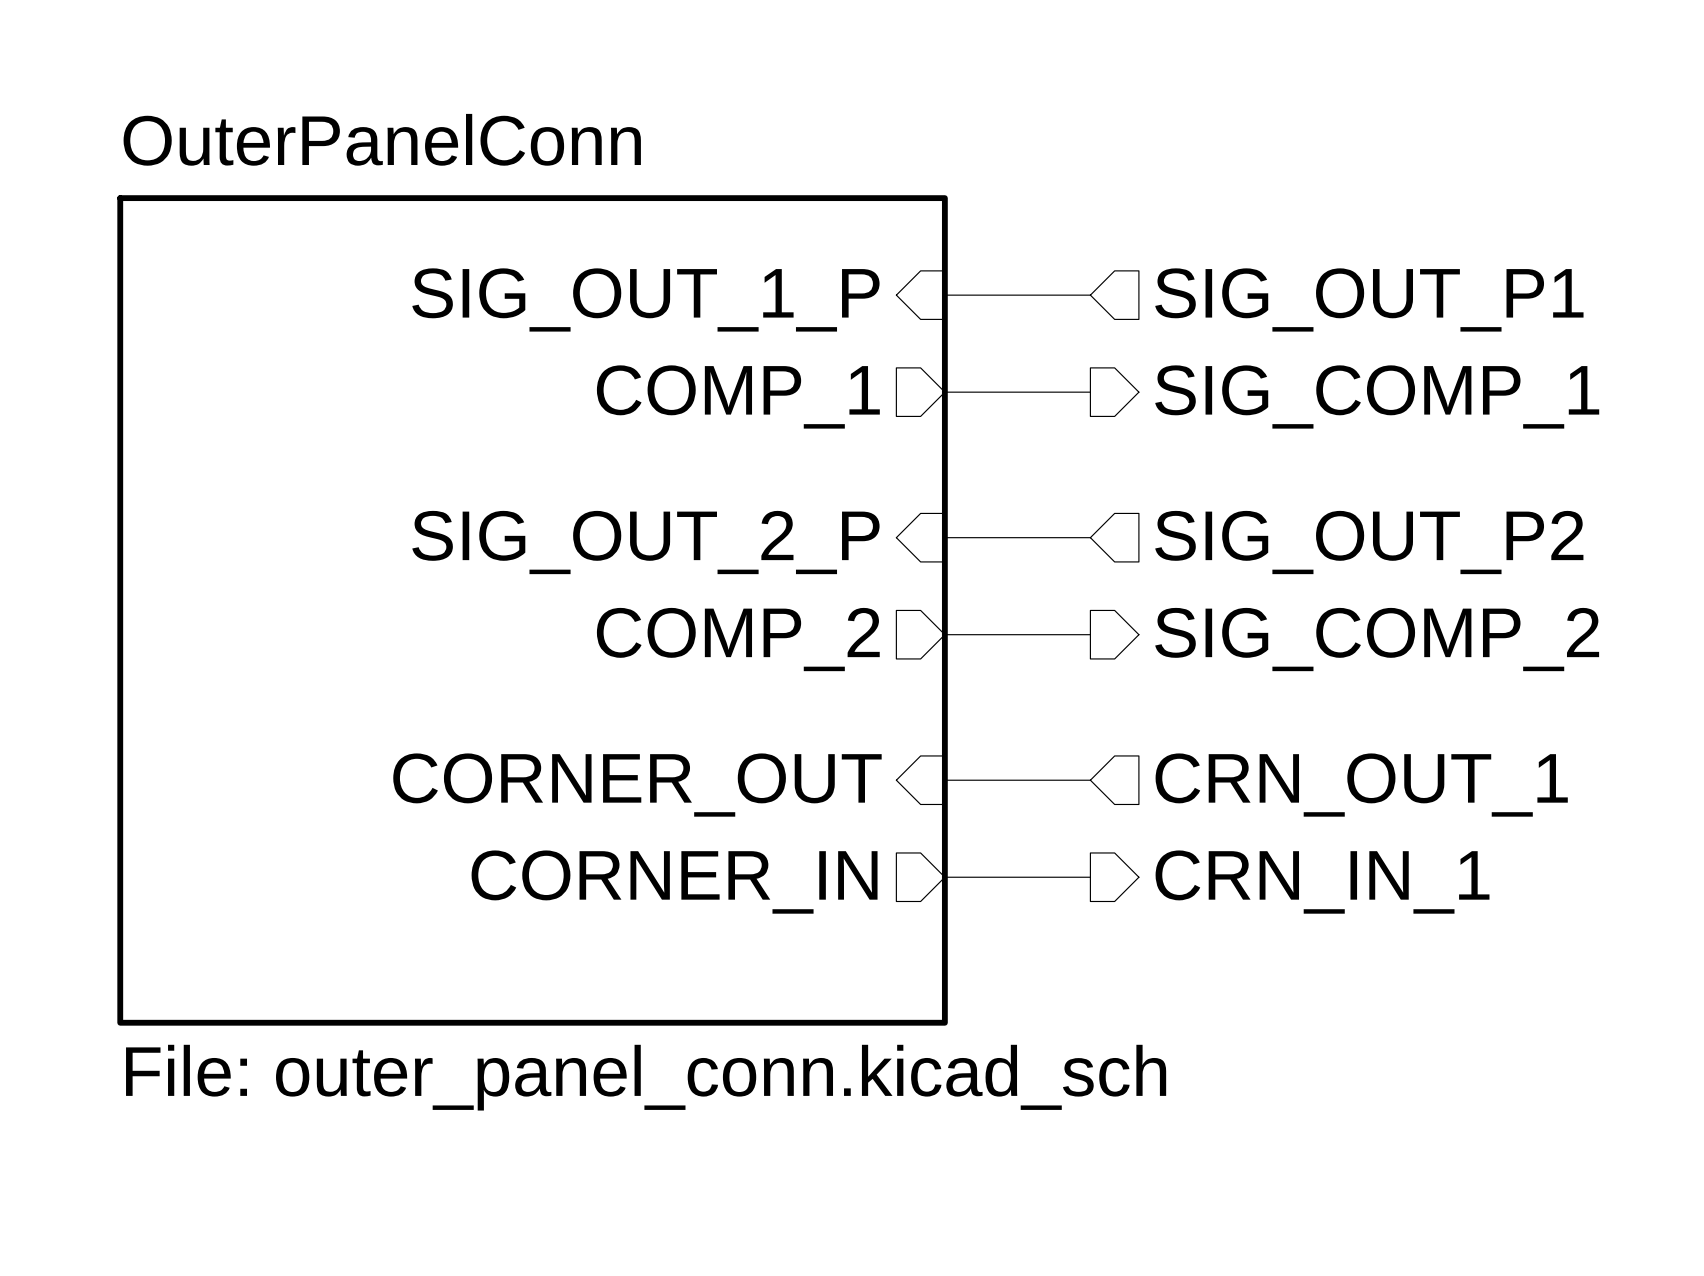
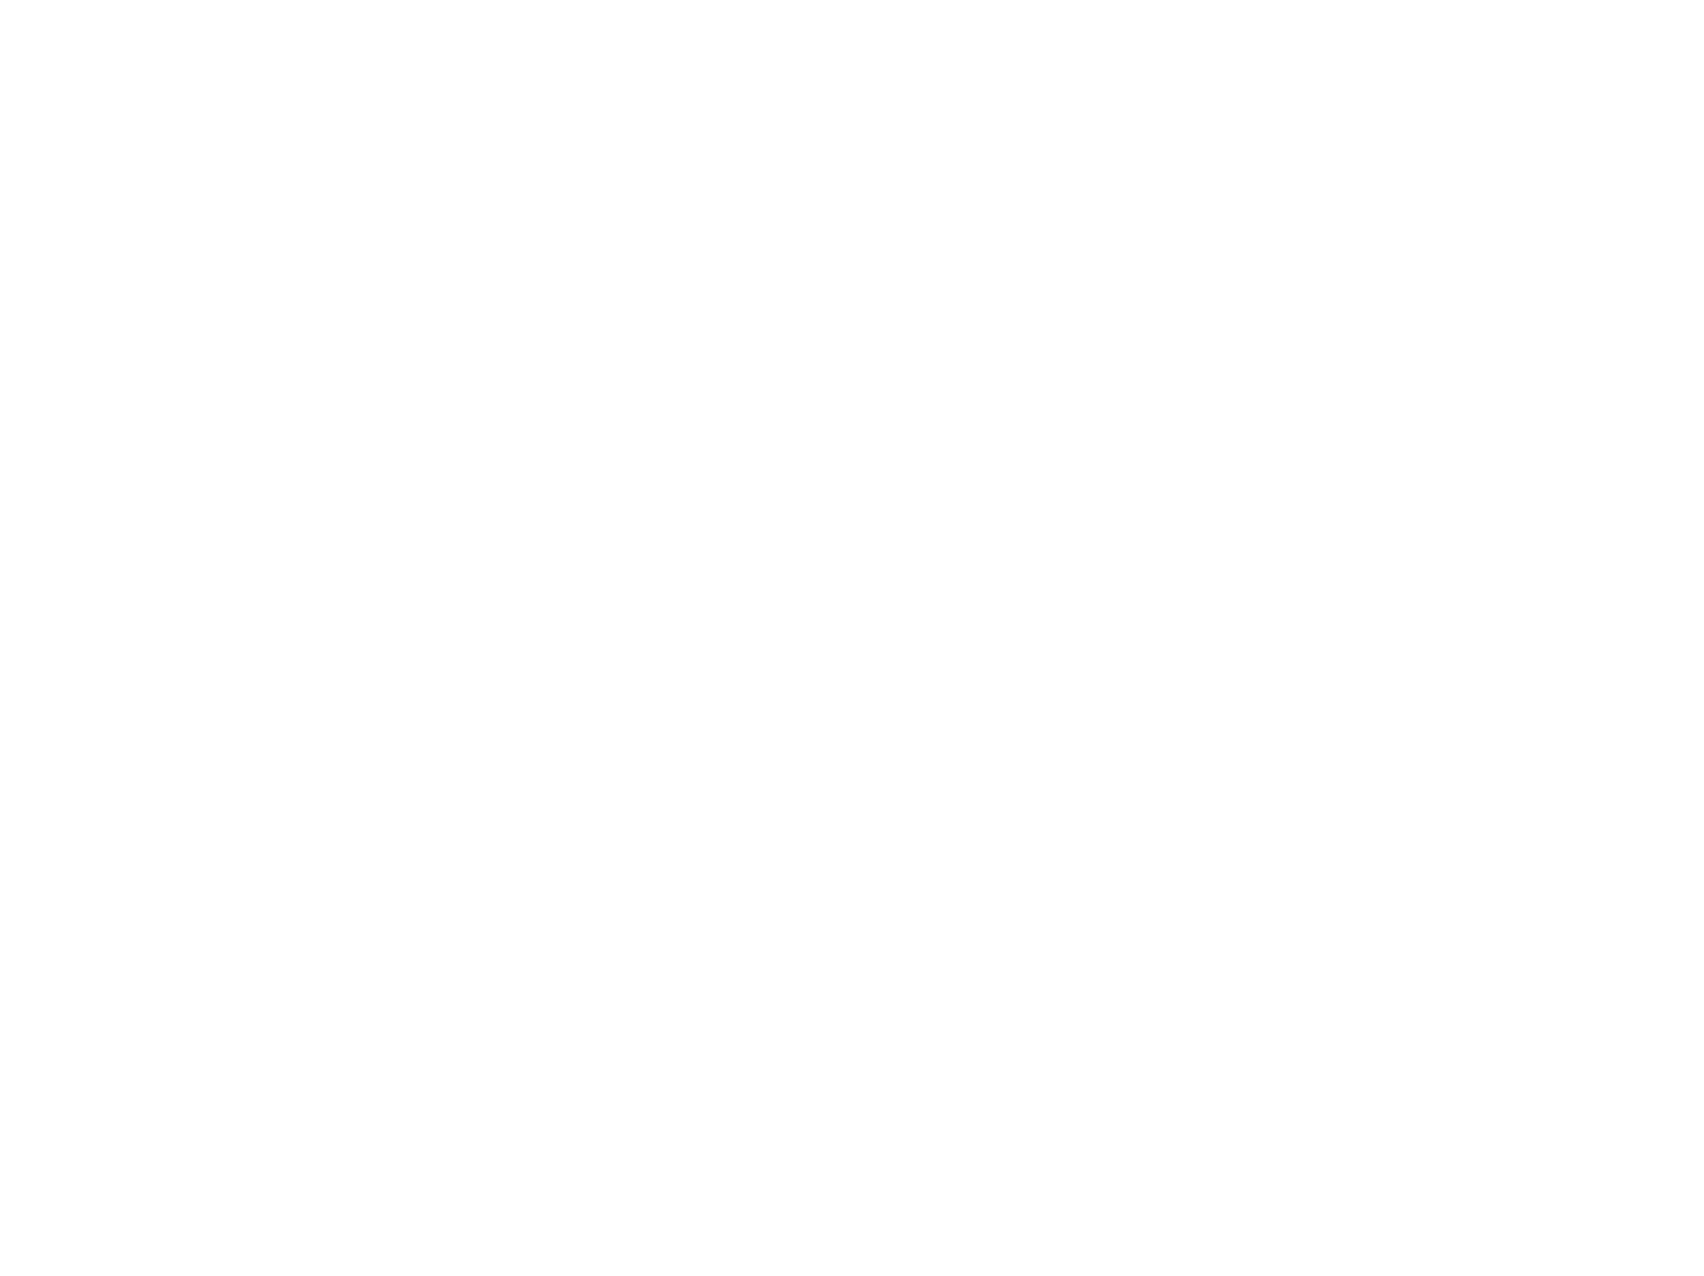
wire: (944, 295) (1090, 295) -> none
sheet pin: SIG_OUT_1_P (645, 299) -> none
hierarchical label: SIG_OUT_P1 (1369, 299) -> none
wire: (944, 392) (1090, 392) -> none
sheet pin: COMP_1 (738, 396) -> none
hierarchical label: SIG_COMP_1 (1377, 396) -> none
wire: (944, 537) (1090, 537) -> none
sheet pin: SIG_OUT_2_P (645, 542) -> none
hierarchical label: SIG_OUT_P2 (1369, 542) -> none
sheet OuterPanelConn: File: outer_panel_conn.kicad_sch (532, 610) -> none
wire: (944, 634) (1090, 634) -> none
sheet pin: COMP_2 (738, 639) -> none
hierarchical label: SIG_COMP_2 (1377, 639) -> none
wire: (944, 780) (1090, 780) -> none
sheet pin: CORNER_OUT (637, 785) -> none
hierarchical label: CRN_OUT_1 (1361, 785) -> none
wire: (944, 877) (1090, 877) -> none
sheet pin: CORNER_IN (674, 882) -> none
hierarchical label: CRN_IN_1 (1322, 882) -> none

